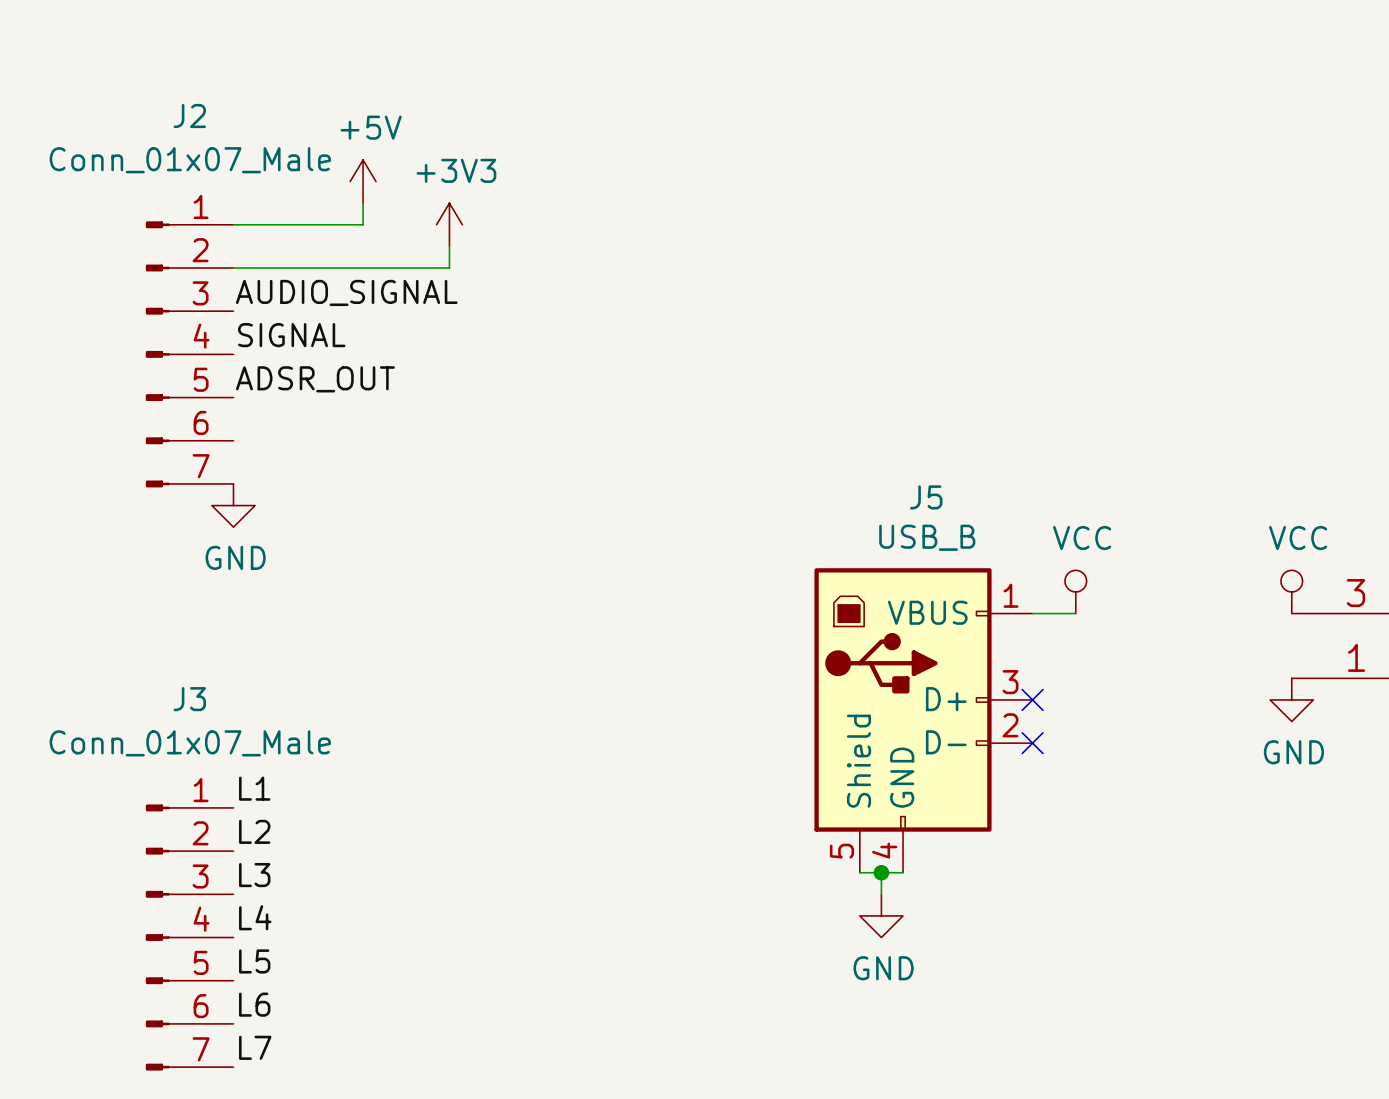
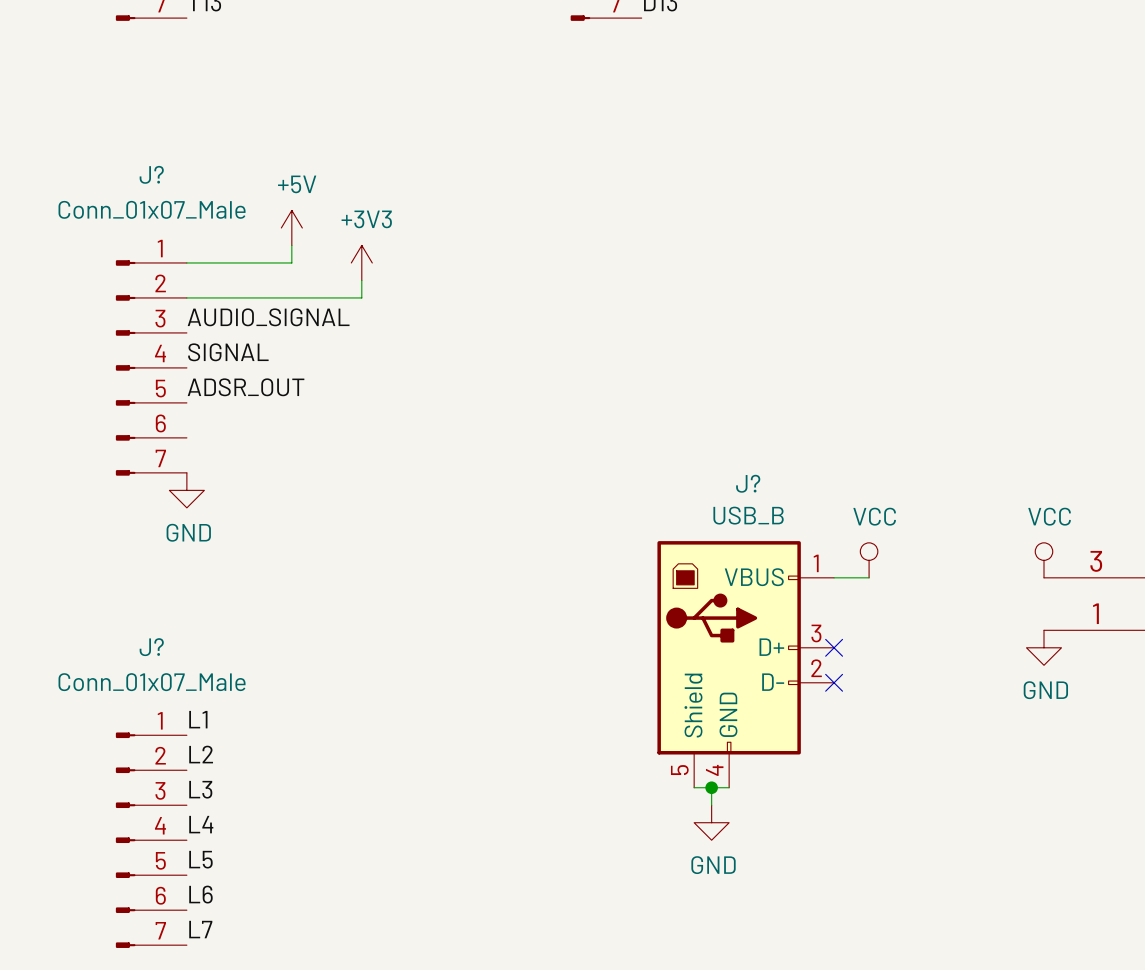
J2 name: J2 (189, 116) -> J? (151, 174)
J5 name: J5 (926, 497) -> J? (748, 483)
J3 name: J3 (189, 699) -> J? (151, 647)

